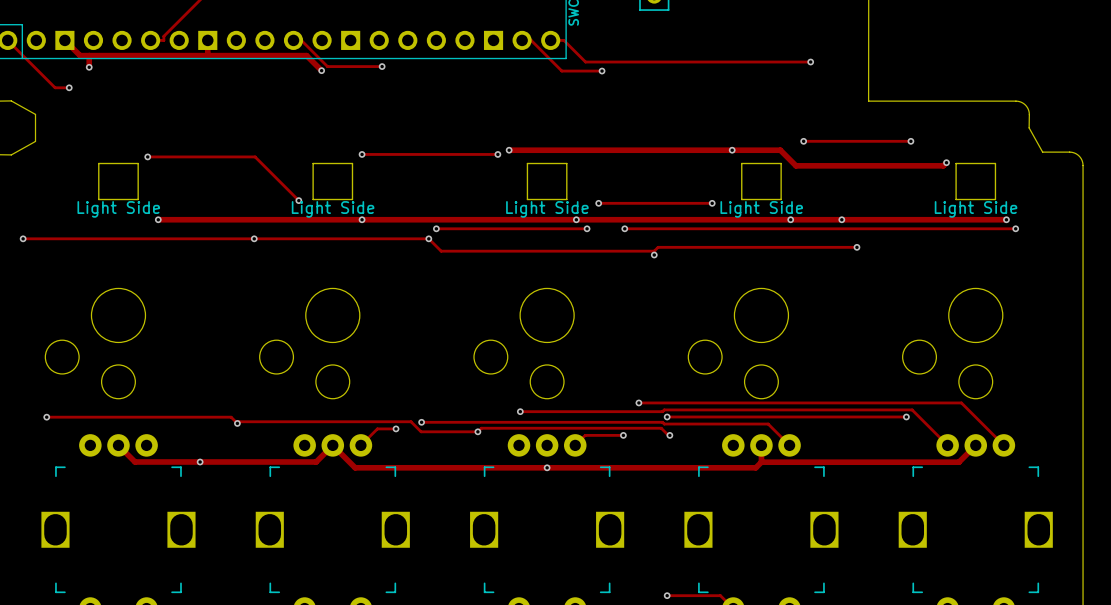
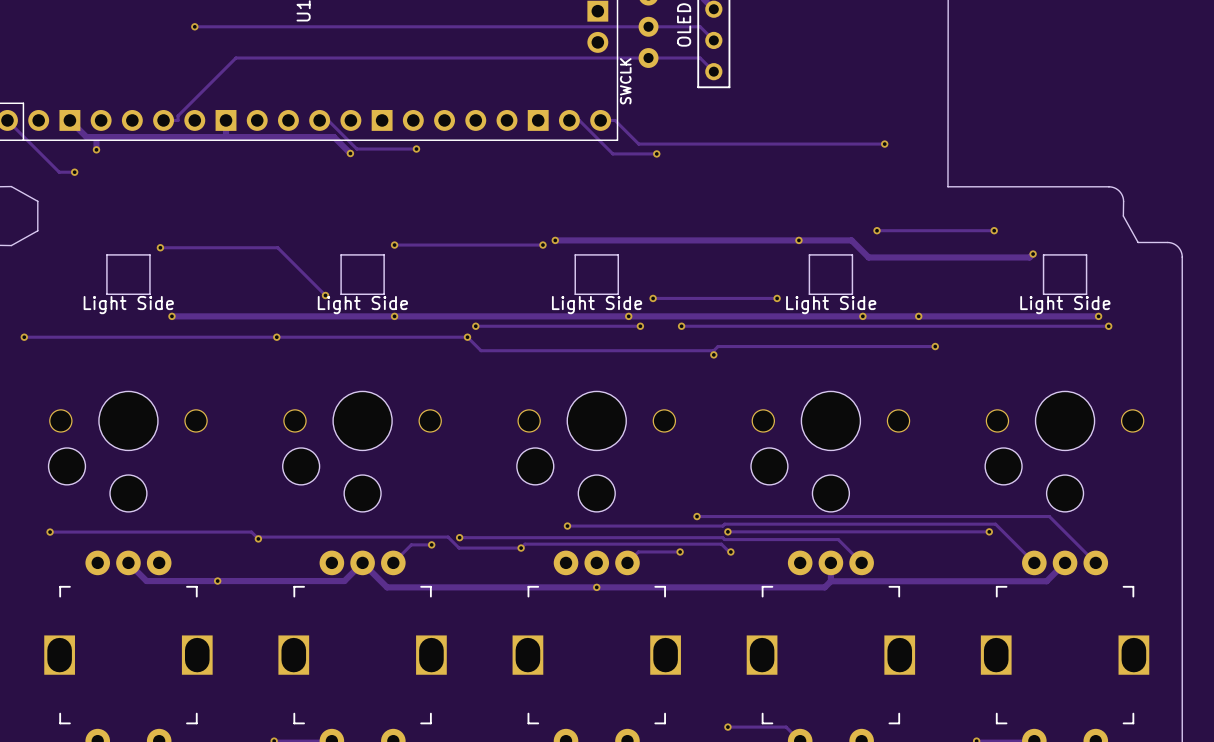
part: none -> (128, 451)
part: none -> (362, 451)
part: none -> (596, 451)
part: none -> (830, 451)
part: none -> (1064, 451)

